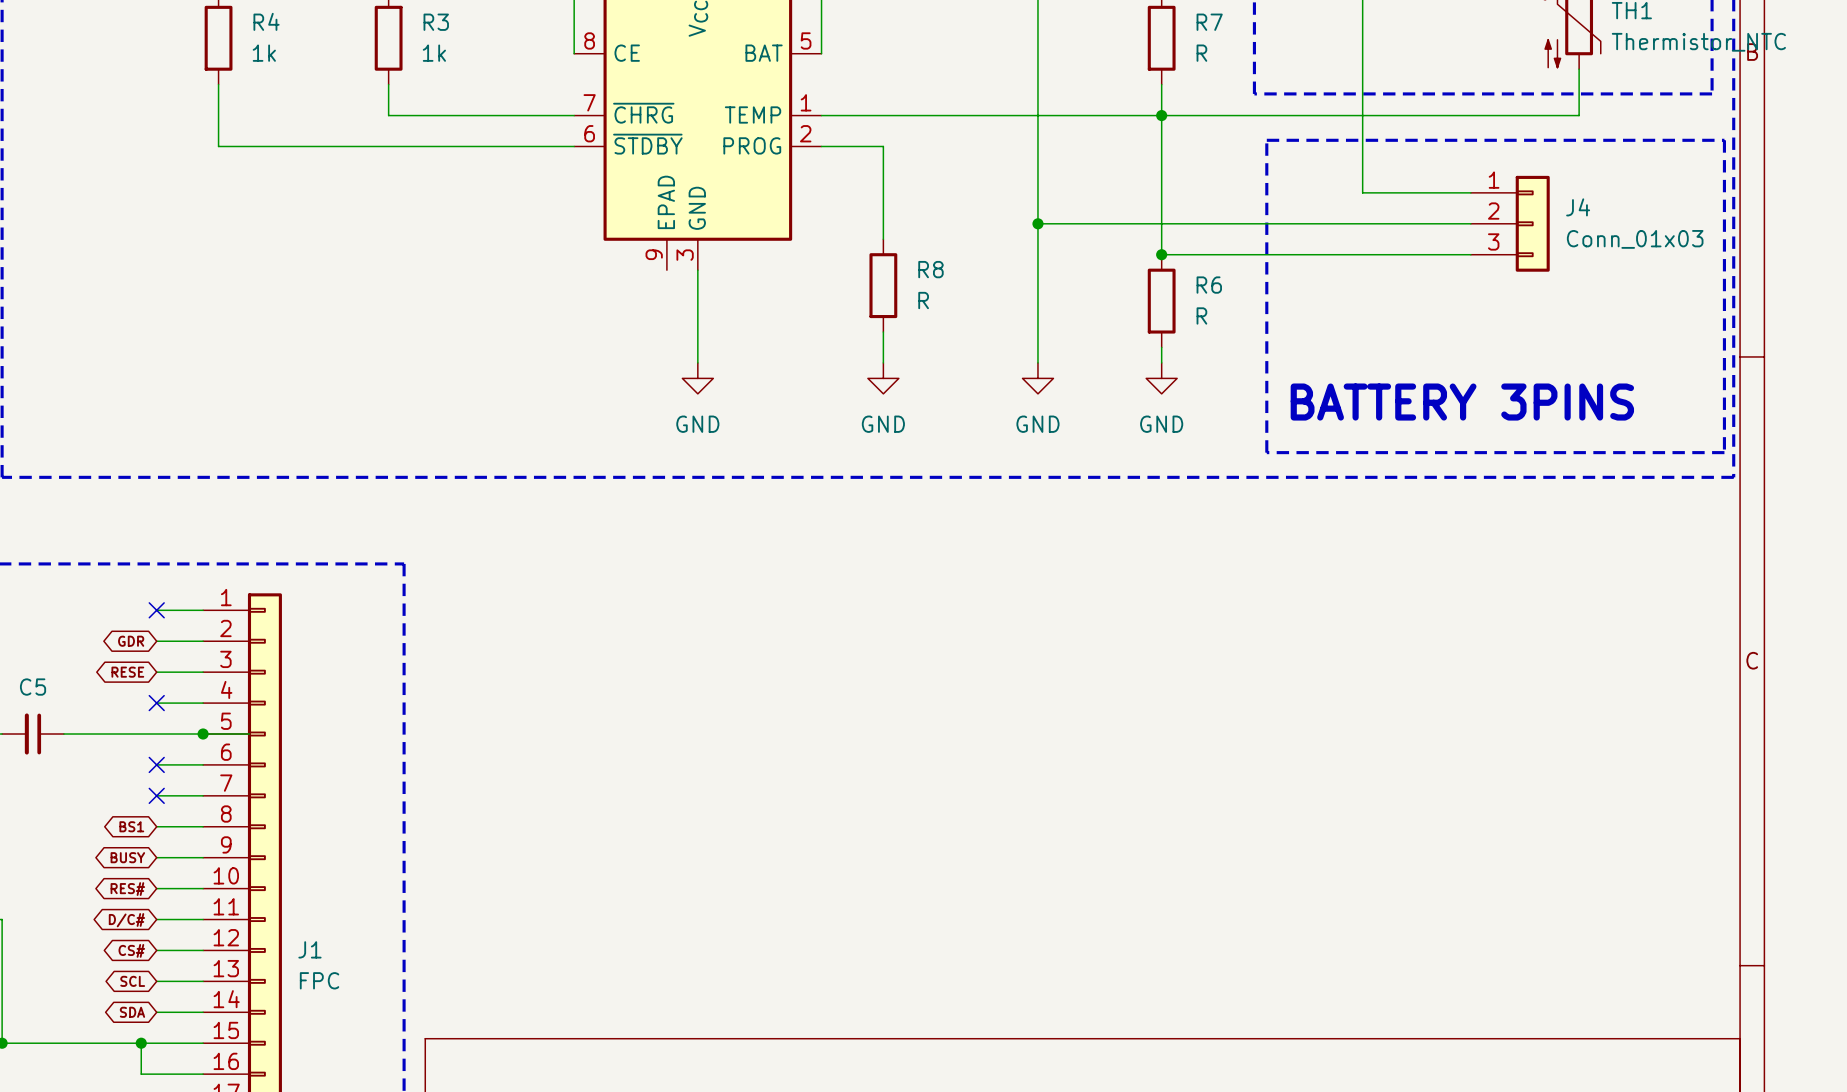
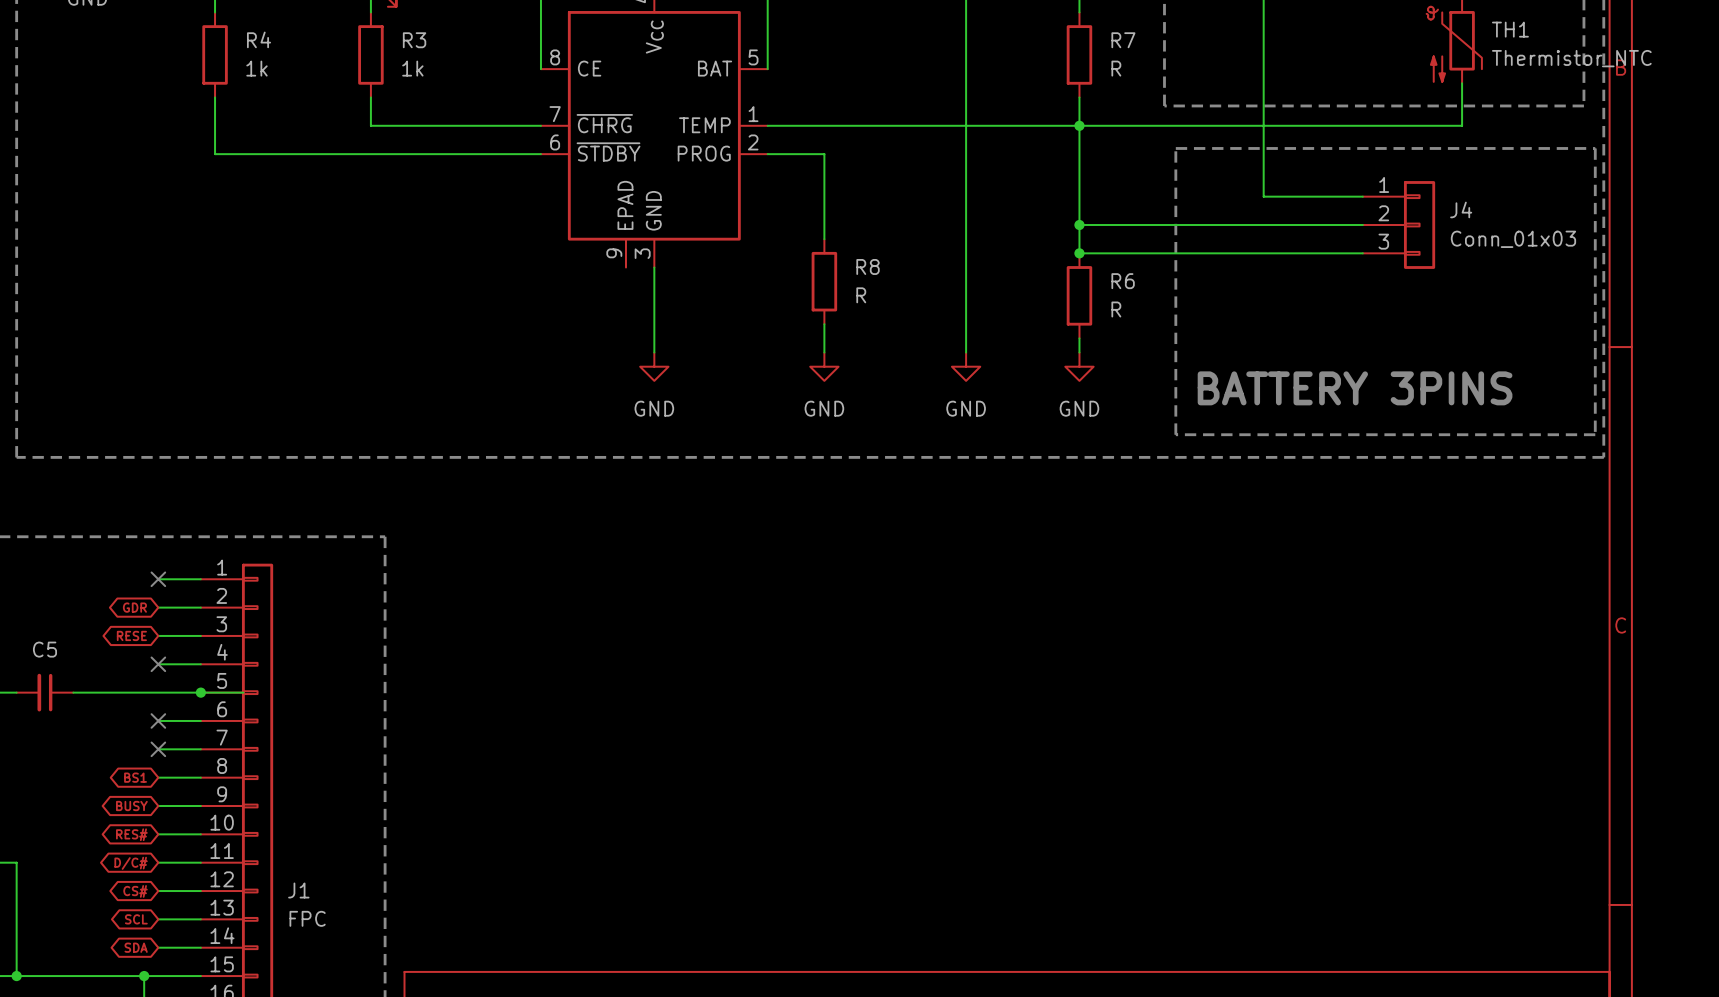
wire: (1037, 223) (1161, 223) -> none
junction: (1037, 223) -> none
junction: none -> (1079, 224)

